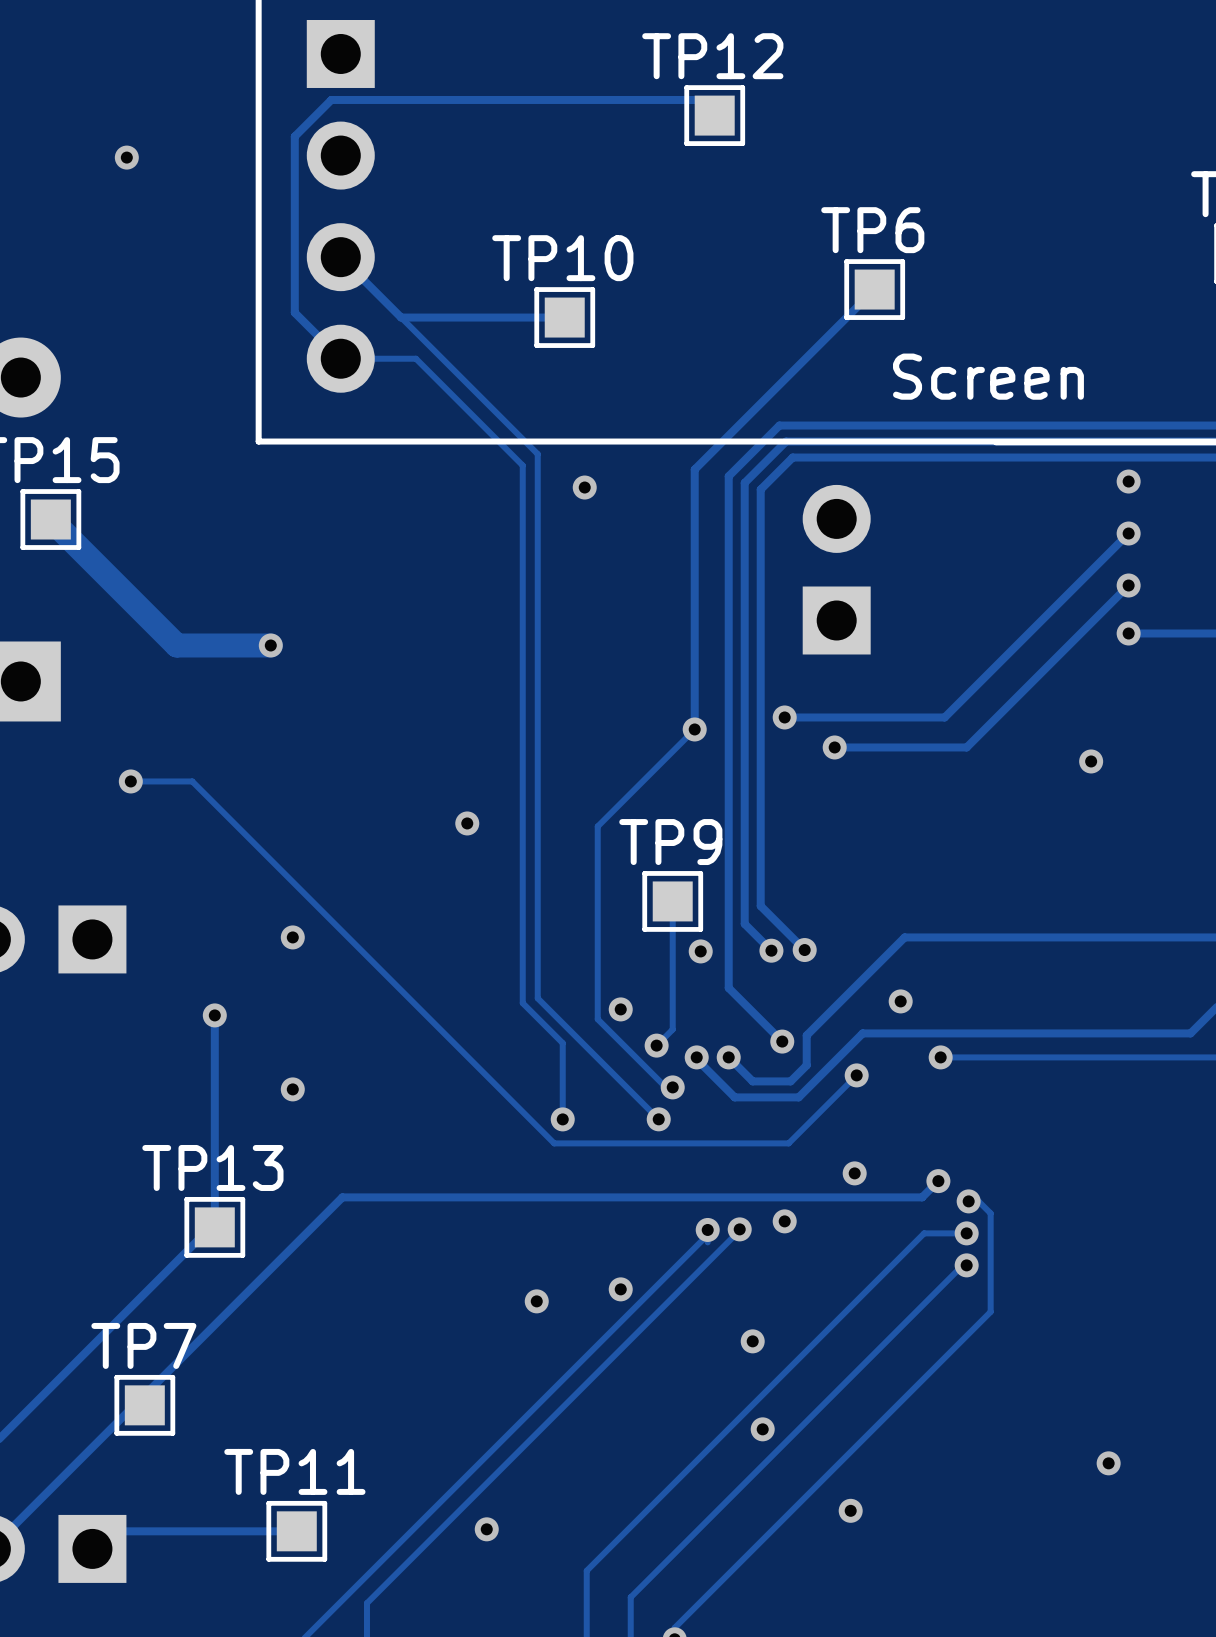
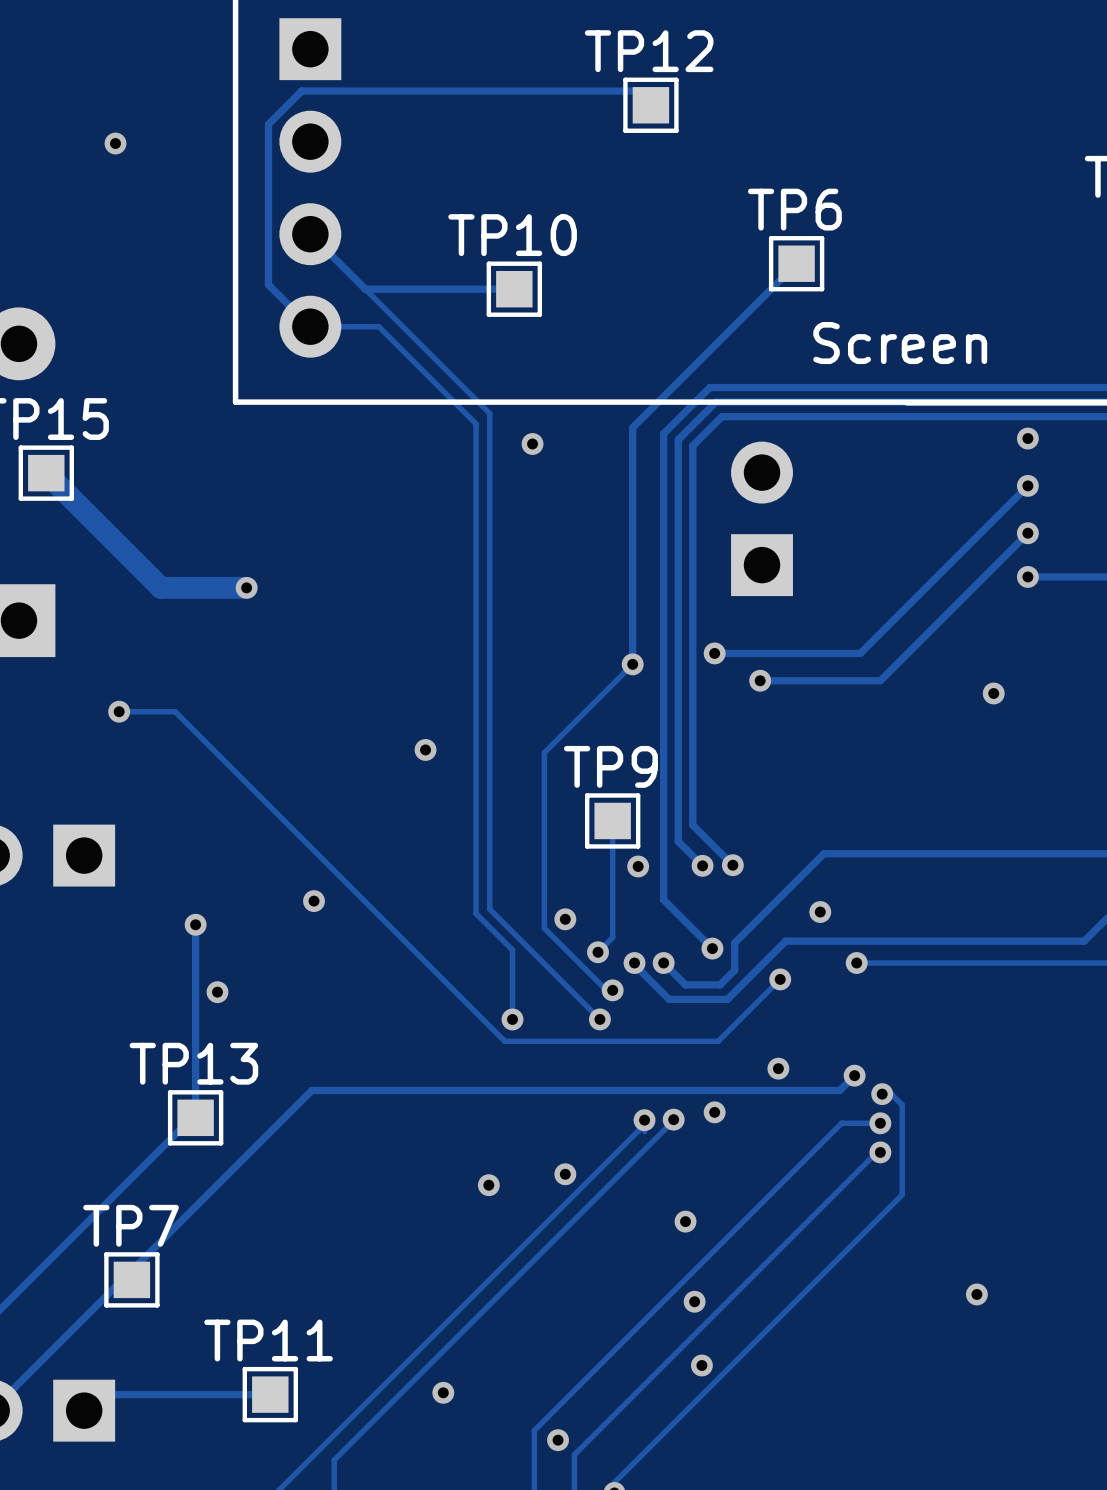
via: (292, 937) -> none
via: none -> (314, 901)
via position: (292, 1089) -> (217, 992)
via position: (1108, 1463) -> (976, 1294)
via position: (850, 1510) -> (701, 1365)
via: none -> (558, 1440)

